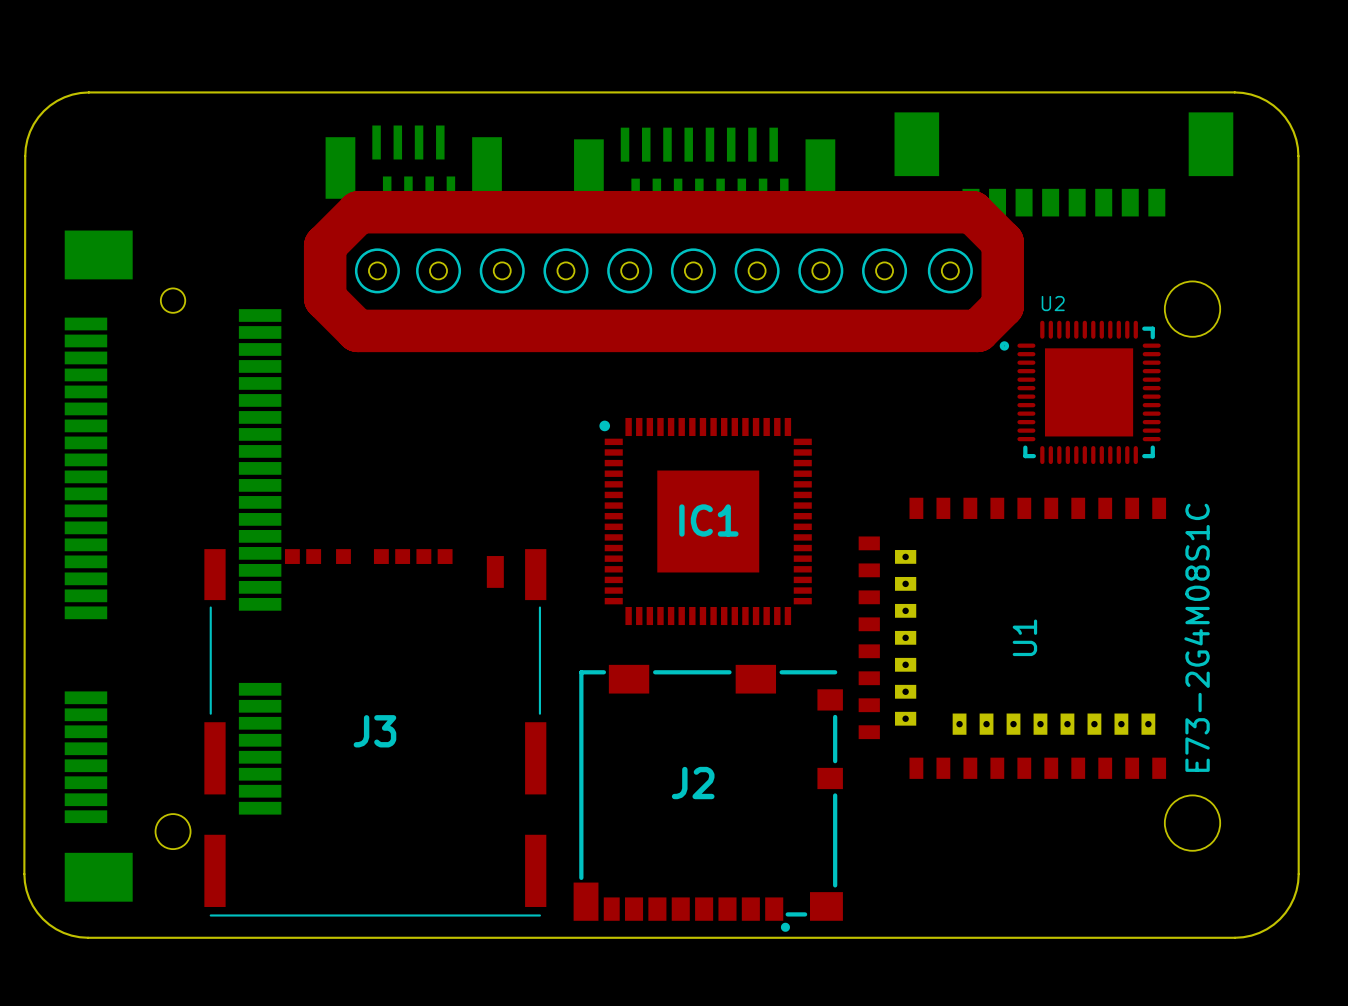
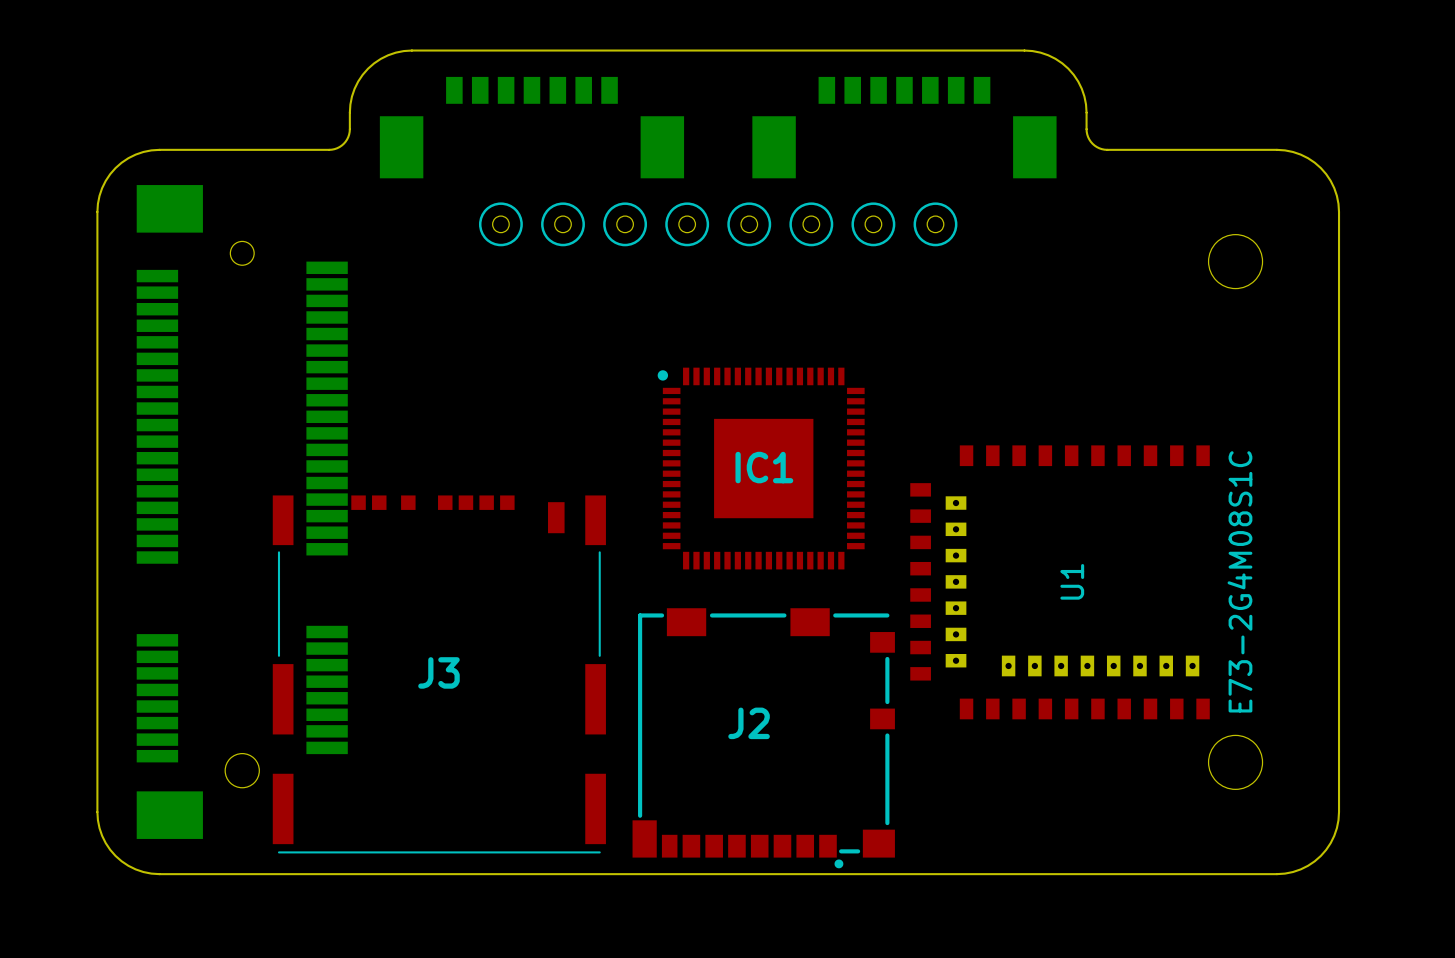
board edge: (347, 92) (80, 92) (64, 97) (50, 105) (38, 117) (30, 131) (25, 156) (24, 874) -> (411, 50) (388, 55) (374, 63) (362, 74) (351, 96) (348, 137) (343, 143) (337, 148) (151, 150) (135, 154) (121, 162) (110, 174) (102, 188) (97, 211) (97, 812)
board edge: (975, 92) (1243, 92) (1259, 97) (1273, 105) (1285, 117) (1293, 131) (1298, 156) (1298, 874) -> (1024, 50) (1048, 55) (1062, 63) (1073, 74) (1084, 96) (1088, 137) (1092, 143) (1099, 148) (1285, 150) (1300, 154) (1314, 162) (1326, 174) (1334, 188) (1339, 211) (1339, 812)
part: (1063, 164) -> none
part: (413, 167) -> none
part: (704, 170) -> none
part: none -> (531, 127)
part: none -> (904, 127)
top track: (358, 212) (972, 212) (1002, 242) (1002, 306) (977, 330) (357, 330) (325, 298) (325, 245) (358, 212) -> none
drawing: [354, 248, 400, 294] -> none
drawing: [927, 248, 973, 294] -> none
round board edge: [368, 261, 387, 280] -> none
round board edge: [941, 261, 960, 280] -> none
U2: (1080, 392) -> none

